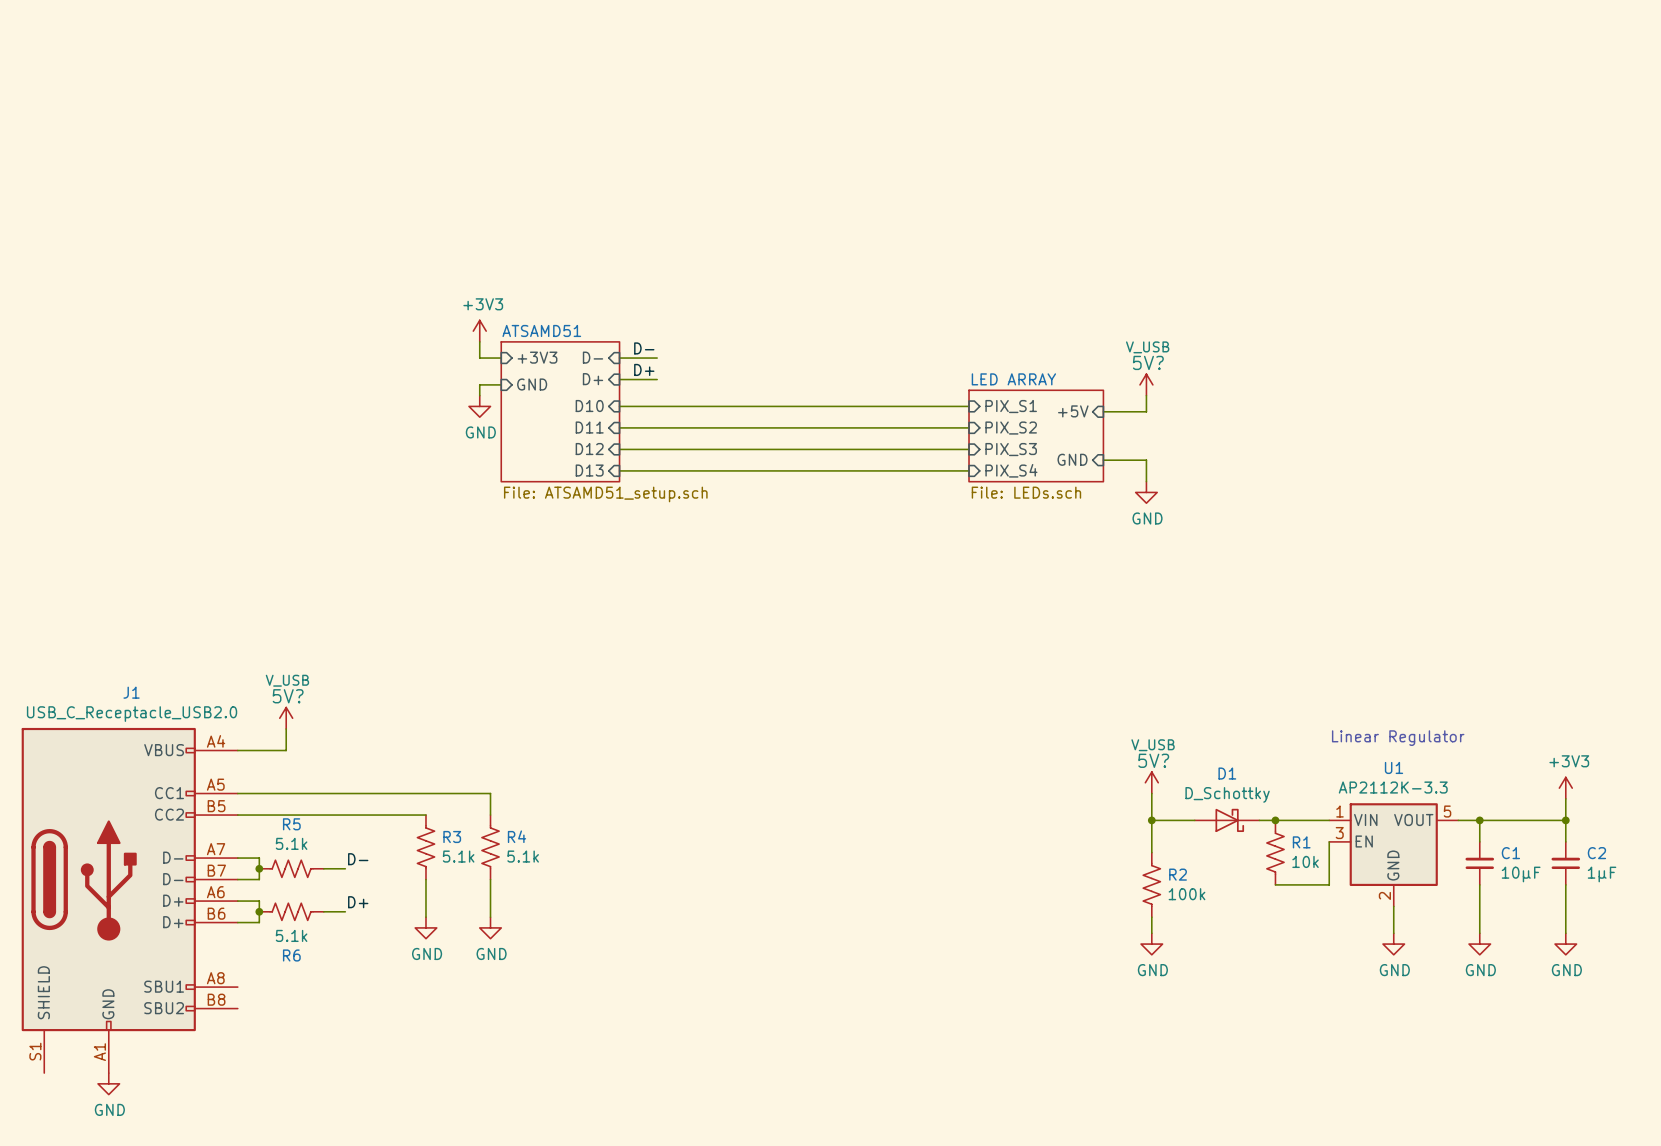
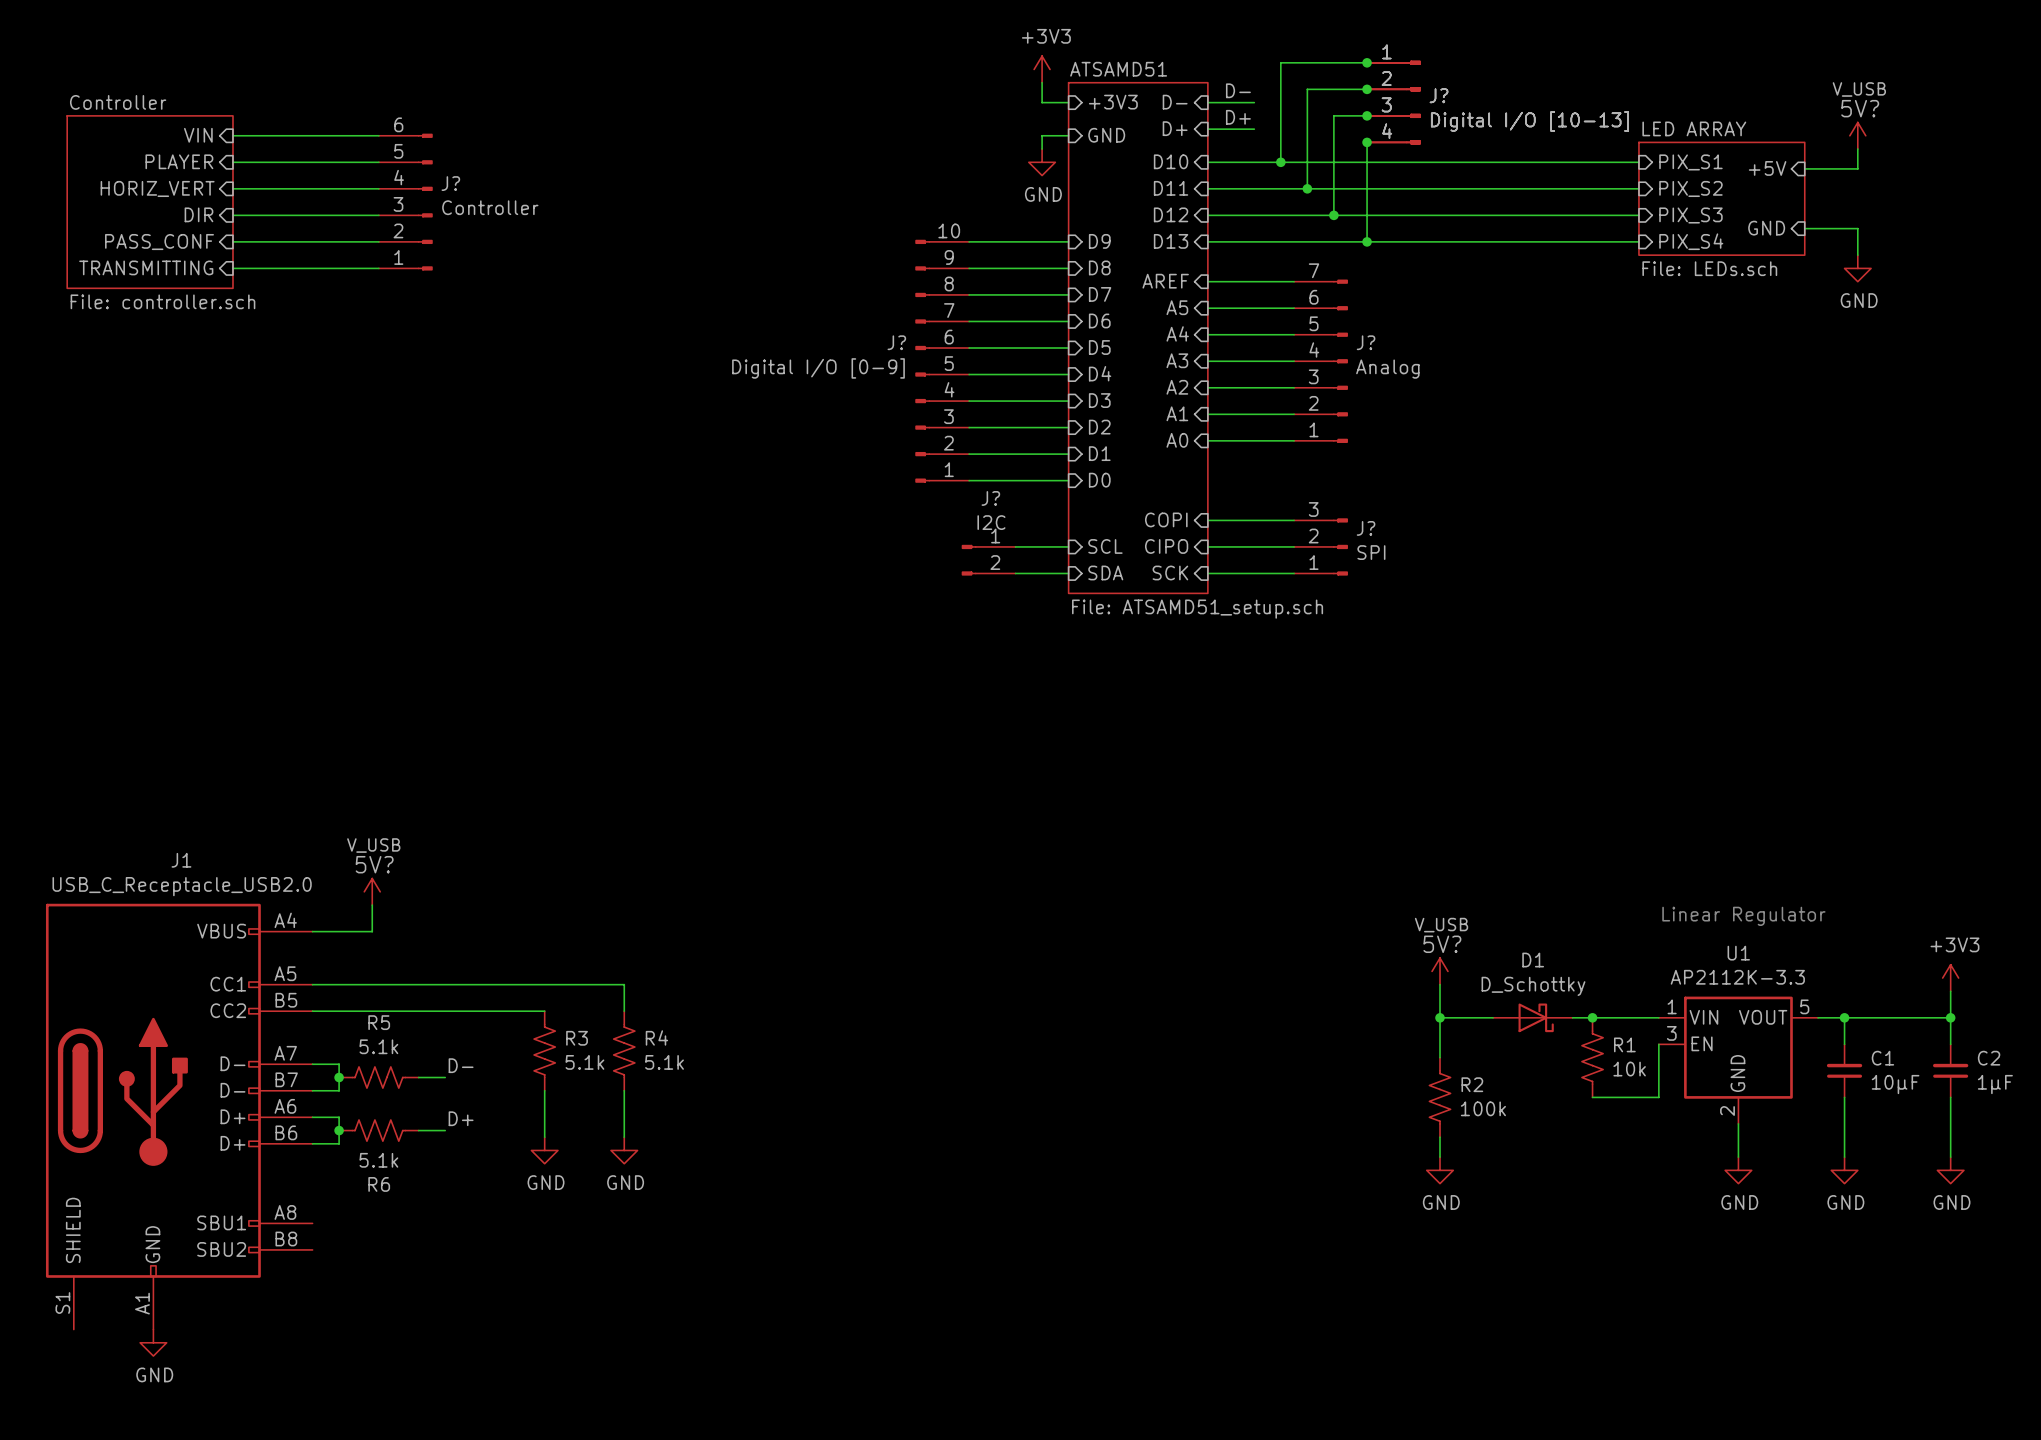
wire: none -> (1367, 62) (1280, 62) (1280, 162)
junction: none -> (1367, 62)
power symbol: none -> +3V3 (1042, 69)
wire: none -> (1042, 82) (1042, 102) (1068, 102)
wire: none -> (1367, 89) (1307, 89) (1307, 188)
junction: none -> (1367, 89)
label: none -> D- (1238, 90)
sheet pin: none -> +3V3 (1113, 102)
sheet pin: none -> D- (1175, 102)
wire: none -> (1207, 102) (1254, 102)
J?: none -> Digital I/O [10-13] (1393, 102)
wire: none -> (1367, 115) (1333, 115) (1333, 215)
junction: none -> (1367, 115)
label: none -> D+ (1238, 117)
sheet pin: none -> D+ (1175, 128)
wire: none -> (1207, 129) (1254, 129)
sheet pin: none -> VIN (198, 135)
sheet pin: none -> GND (1106, 135)
wire: none -> (232, 135) (378, 135)
wire: none -> (1068, 135) (1042, 135) (1042, 149)
power symbol: none -> V_USB (1857, 135)
wire: none -> (1367, 142) (1367, 241)
junction: none -> (1367, 142)
wire: none -> (1857, 149) (1857, 168) (1804, 168)
sheet pin: none -> PLAYER (179, 161)
wire: none -> (232, 162) (378, 162)
power symbol: none -> GND (1042, 162)
sheet pin: none -> D10 (1171, 161)
wire: none -> (1207, 162) (1638, 162)
junction: none -> (1280, 162)
sheet pin: none -> PIX_S1 (1690, 162)
sheet pin: none -> +5V (1767, 168)
sheet pin: none -> D11 (1171, 188)
sheet pin: none -> HORIZ_VERT (157, 188)
wire: none -> (232, 188) (378, 188)
wire: none -> (1207, 188) (1638, 188)
junction: none -> (1307, 188)
sheet pin: none -> PIX_S2 (1690, 188)
sheet LED ARRAY: none -> File: LEDs.sch (1721, 198)
sheet Controller: none -> File: controller.sch (150, 202)
J?: none -> Controller (405, 202)
sheet pin: none -> DIR (198, 214)
wire: none -> (232, 215) (378, 215)
sheet pin: none -> D12 (1171, 214)
wire: none -> (1207, 215) (1638, 215)
junction: none -> (1333, 215)
sheet pin: none -> PIX_S3 (1690, 215)
sheet pin: none -> GND (1766, 228)
wire: none -> (1804, 228) (1857, 228) (1857, 255)
sheet pin: none -> D9 (1099, 241)
sheet pin: none -> D13 (1171, 241)
sheet pin: none -> PASS_CONF (159, 242)
wire: none -> (232, 241) (378, 241)
wire: none -> (969, 241) (1068, 241)
wire: none -> (1207, 241) (1638, 241)
junction: none -> (1367, 241)
sheet pin: none -> PIX_S4 (1691, 241)
sheet pin: none -> TRANSMITTING (146, 267)
wire: none -> (232, 268) (378, 268)
wire: none -> (969, 268) (1068, 268)
sheet pin: none -> D8 (1099, 267)
power symbol: none -> GND (1857, 268)
sheet pin: none -> AREF (1165, 281)
wire: none -> (1207, 281) (1294, 281)
sheet pin: none -> D7 (1100, 294)
wire: none -> (969, 294) (1068, 294)
sheet pin: none -> A5 (1177, 307)
wire: none -> (1207, 308) (1294, 308)
wire: none -> (969, 321) (1068, 321)
sheet pin: none -> D6 (1099, 320)
sheet pin: none -> A4 (1177, 333)
wire: none -> (1207, 334) (1294, 334)
sheet pin: none -> D5 (1099, 347)
wire: none -> (969, 348) (1068, 348)
sheet pin: none -> A3 (1177, 360)
J?: none -> Digital I/O [0-9] (942, 361)
wire: none -> (1207, 361) (1294, 361)
J?: none -> Analog (1321, 361)
wire: none -> (969, 374) (1068, 374)
sheet pin: none -> D4 (1100, 373)
sheet pin: none -> A2 (1177, 387)
wire: none -> (1207, 387) (1294, 387)
sheet pin: none -> D3 (1099, 400)
wire: none -> (969, 401) (1068, 401)
sheet ATSAMD51 name position: ATSAMD51 (541, 330) -> ATSAMD51 (1118, 69)
sheet pin: none -> A1 (1177, 413)
power symbol: +3V3 (479, 331) -> none
wire: none -> (1207, 414) (1294, 414)
wire: (479, 341) (479, 358) (501, 358) -> none
sheet ATSAMD51 shape: [501, 341, 620, 482] -> [1068, 82, 1208, 594]
wire: none -> (969, 427) (1068, 427)
sheet pin: none -> D2 (1099, 427)
label: D- (644, 348) -> none
sheet pin: none -> A0 (1177, 440)
wire: none -> (1207, 440) (1294, 440)
sheet pin: +3V3 (537, 357) -> none
sheet pin: D- (593, 357) -> none
wire: (619, 358) (657, 358) -> none
wire: none -> (969, 454) (1068, 454)
sheet pin: none -> D1 (1099, 453)
label: D+ (644, 369) -> none
sheet pin: D+ (593, 379) -> none
wire: (619, 379) (657, 379) -> none
wire: (501, 384) (479, 384) (479, 395) -> none
sheet pin: GND (532, 384) -> none
wire: none -> (969, 480) (1068, 480)
sheet pin: none -> D0 (1099, 480)
power symbol: V_USB (1146, 384) -> none
wire: (1146, 395) (1146, 411) (1103, 411) -> none
power symbol: GND (479, 406) -> none
sheet pin: D10 (589, 406) -> none
wire: (619, 406) (969, 406) -> none
sheet pin: PIX_S1 (1011, 406) -> none
sheet pin: +5V (1073, 411) -> none
sheet pin: none -> COPI (1166, 519)
wire: none -> (1207, 520) (1294, 520)
sheet pin: D11 (589, 427) -> none
wire: (619, 427) (969, 427) -> none
sheet pin: PIX_S2 (1011, 428) -> none
sheet LED ARRAY: File: LEDs.sch (1036, 435) -> none
wire: none -> (1015, 546) (1068, 546)
sheet pin: none -> SCL (1105, 546)
sheet pin: none -> CIPO (1166, 546)
wire: none -> (1207, 546) (1294, 546)
J?: none -> SPI (1321, 546)
sheet pin: D12 (589, 449) -> none
wire: (619, 449) (969, 449) -> none
J?: none -> I2C (988, 560)
sheet pin: PIX_S3 (1011, 449) -> none
sheet pin: none -> SDA (1105, 572)
sheet pin: none -> SCK (1170, 572)
sheet pin: GND (1072, 459) -> none
wire: none -> (1015, 573) (1068, 573)
wire: none -> (1207, 573) (1294, 573)
wire: (1103, 460) (1146, 460) (1146, 481) -> none
sheet pin: D13 (589, 470) -> none
wire: (619, 470) (969, 470) -> none
sheet pin: PIX_S4 (1011, 470) -> none
power symbol: GND (1146, 492) -> none
sheet ATSAMD51 value position: File: ATSAMD51_setup.sch (605, 494) -> File: ATSAMD51_setup.sch (1197, 609)

